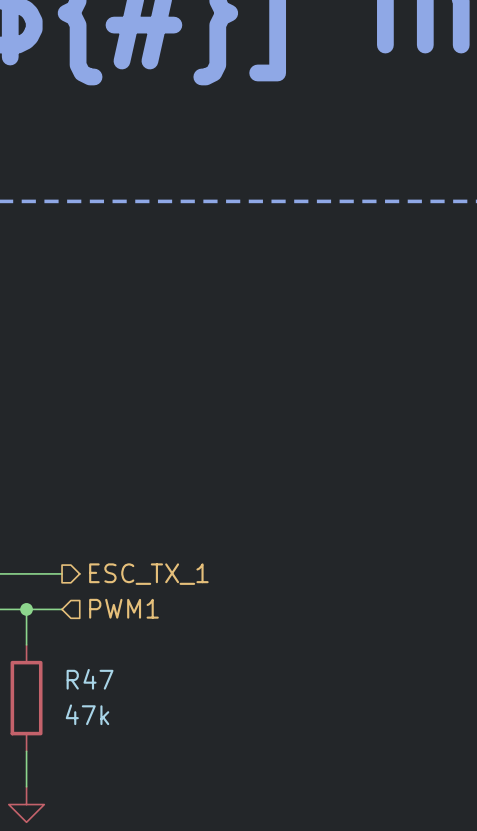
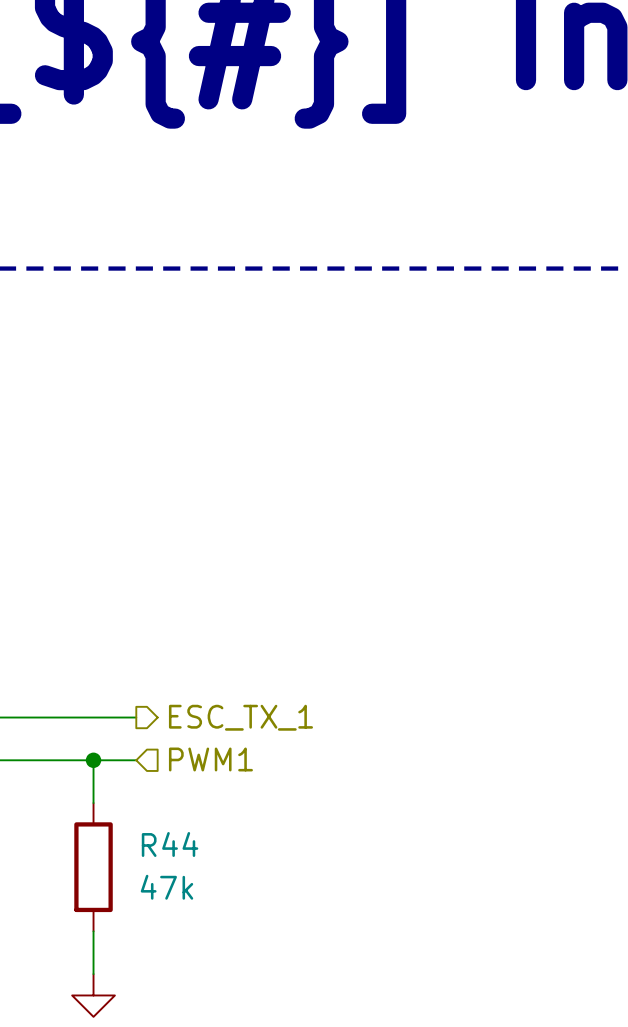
R47 name: R47 (90, 679) -> R44 (170, 844)

